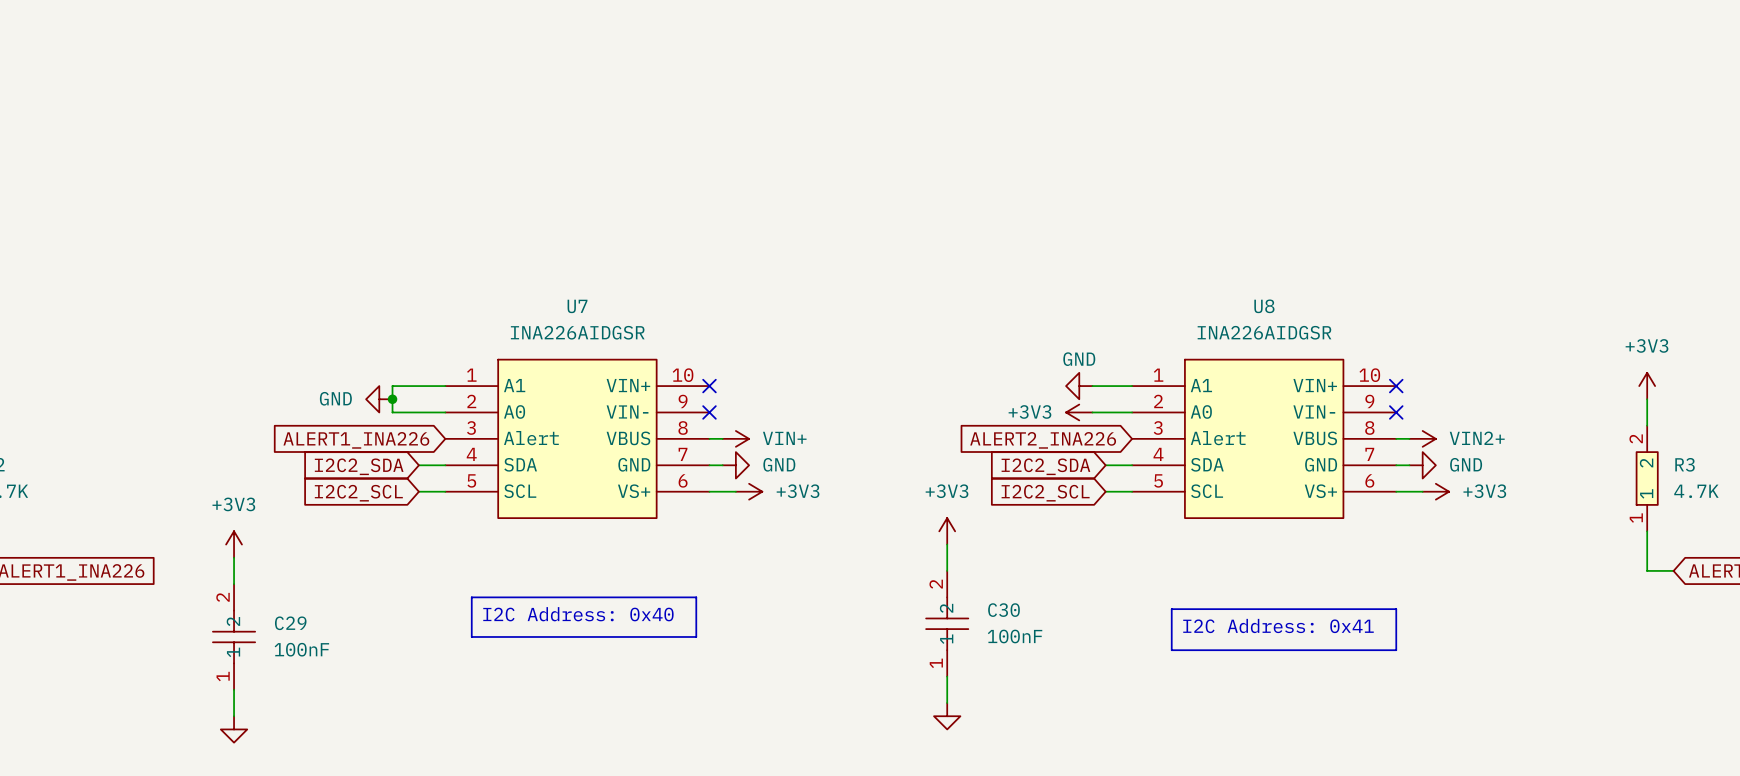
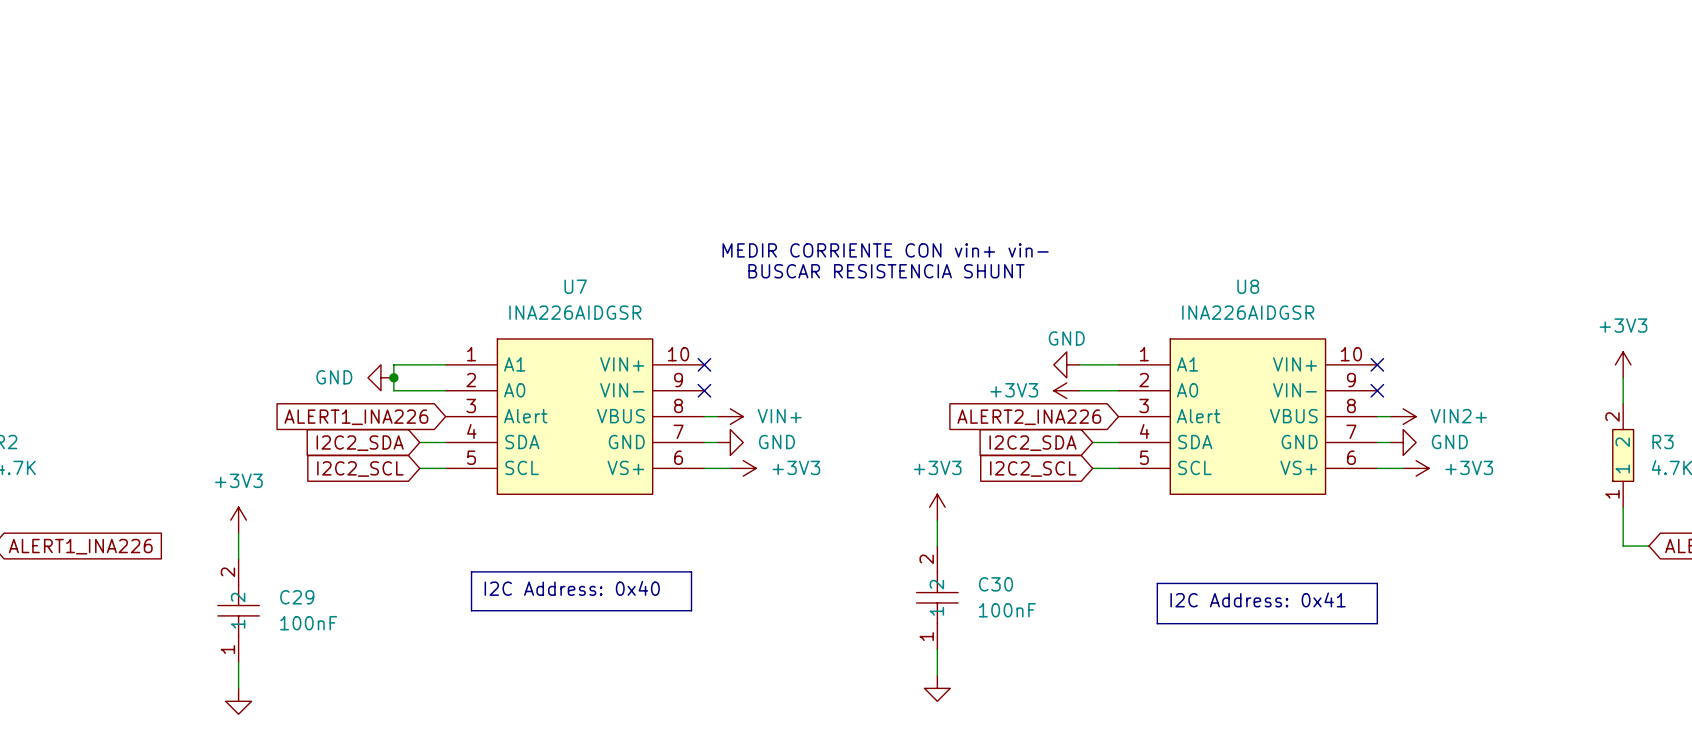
text: none -> MEDIR CORRIENTE CON vin+ vin- (885, 250)
text: none -> BUSCAR RESISTENCIA SHUNT (886, 271)

